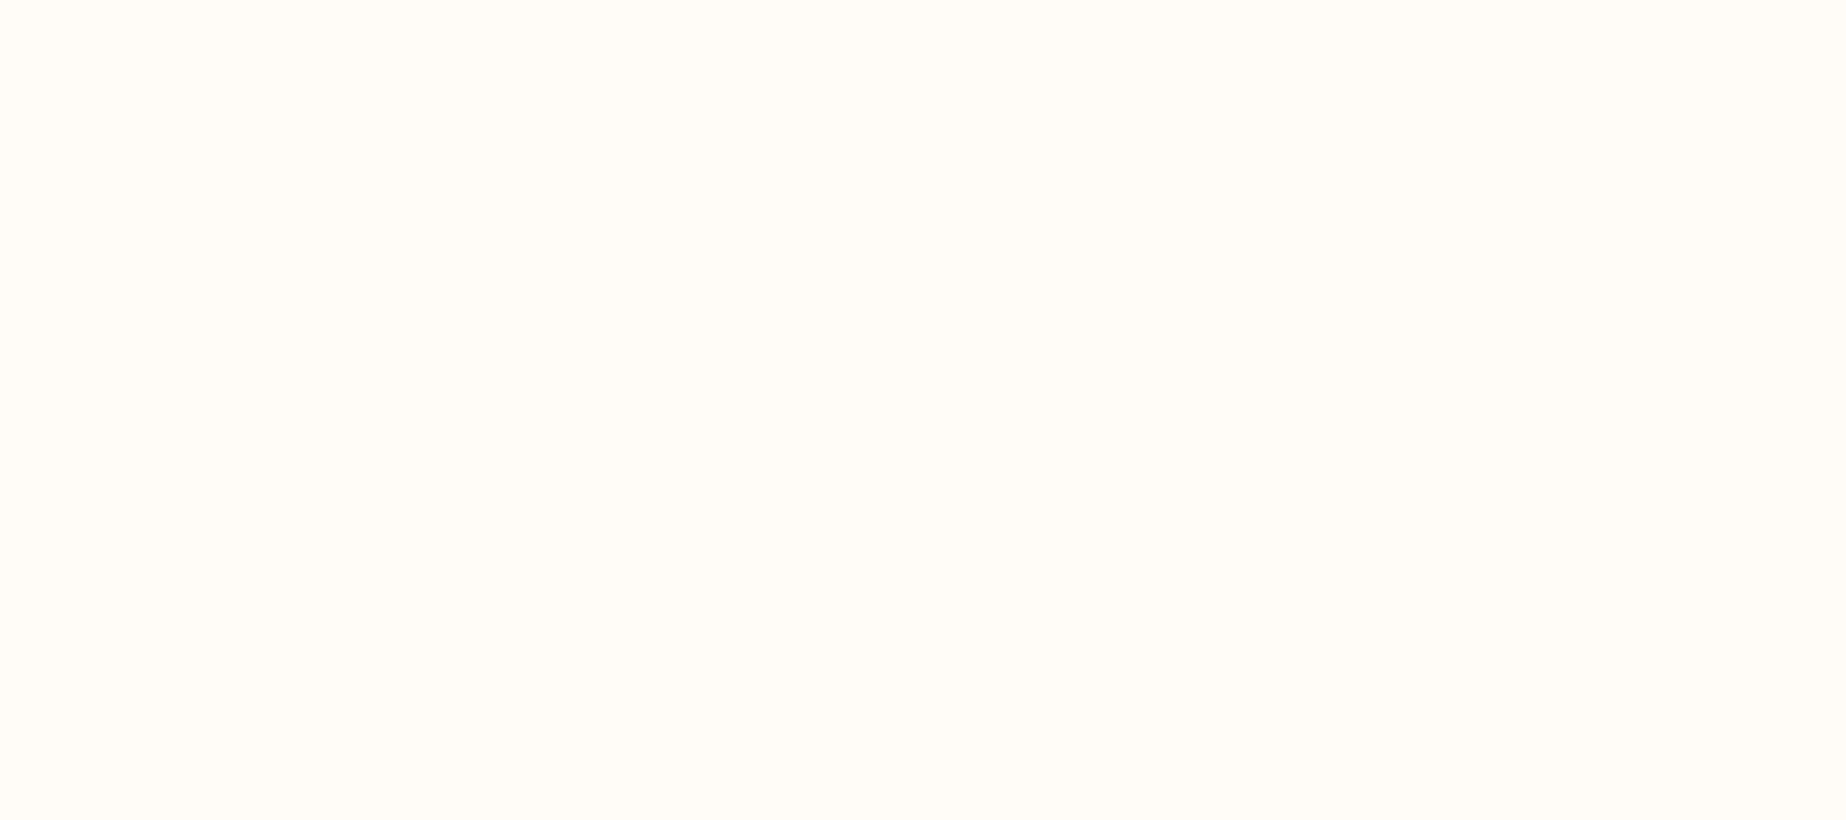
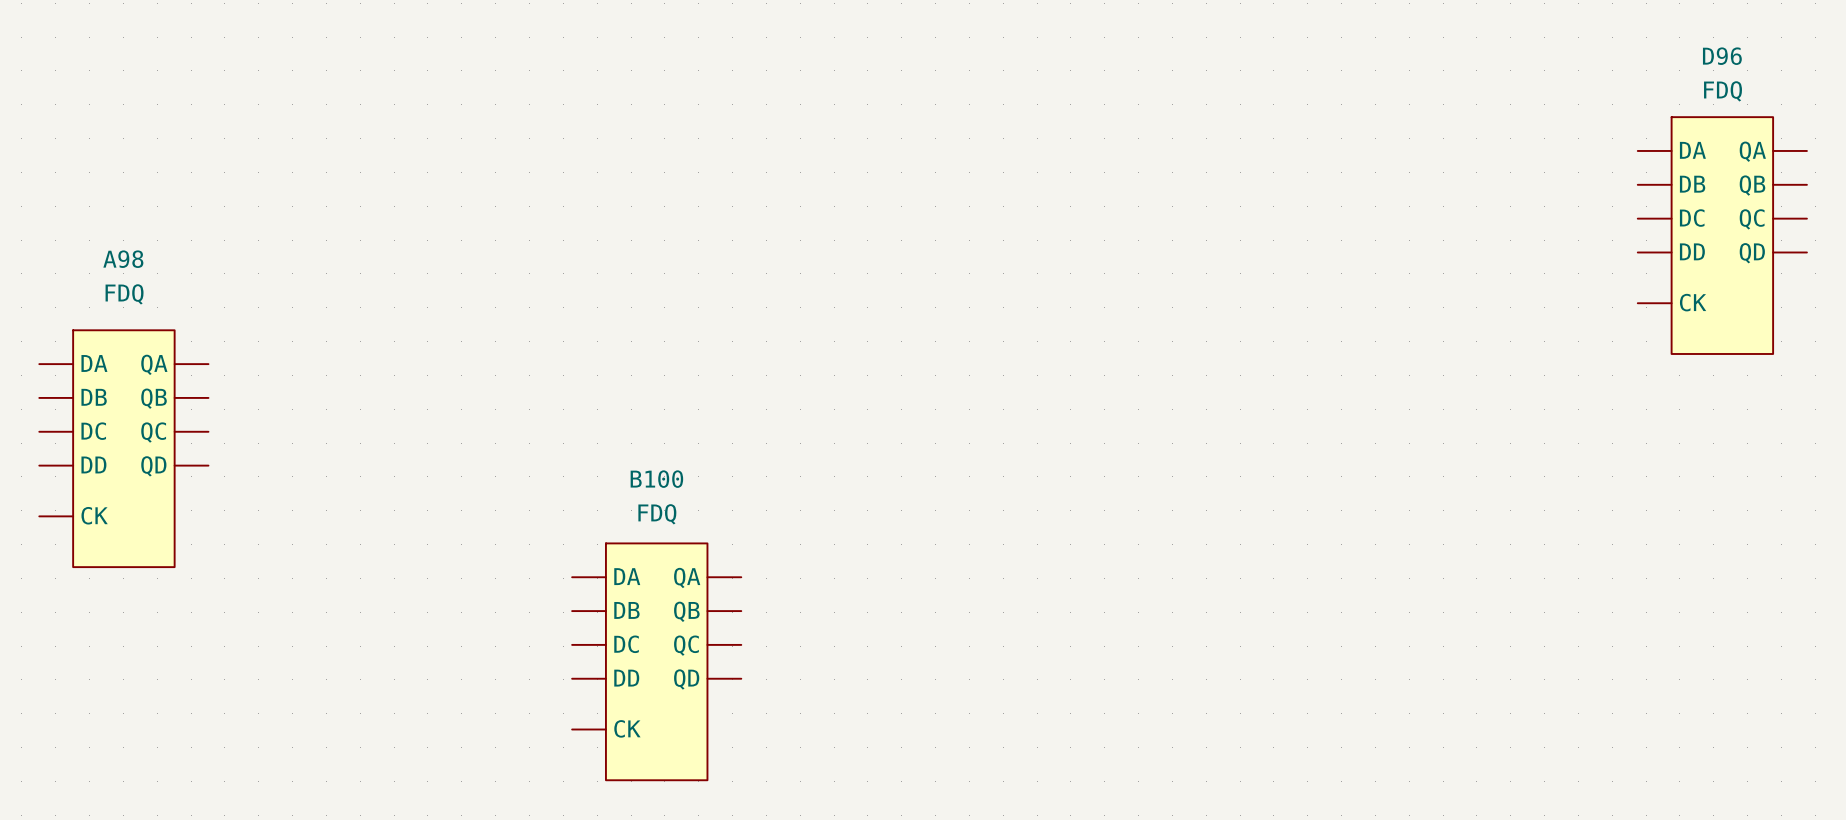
D96: none -> FDQ (1722, 235)
A98: none -> FDQ (123, 448)
B100: none -> FDQ (656, 661)

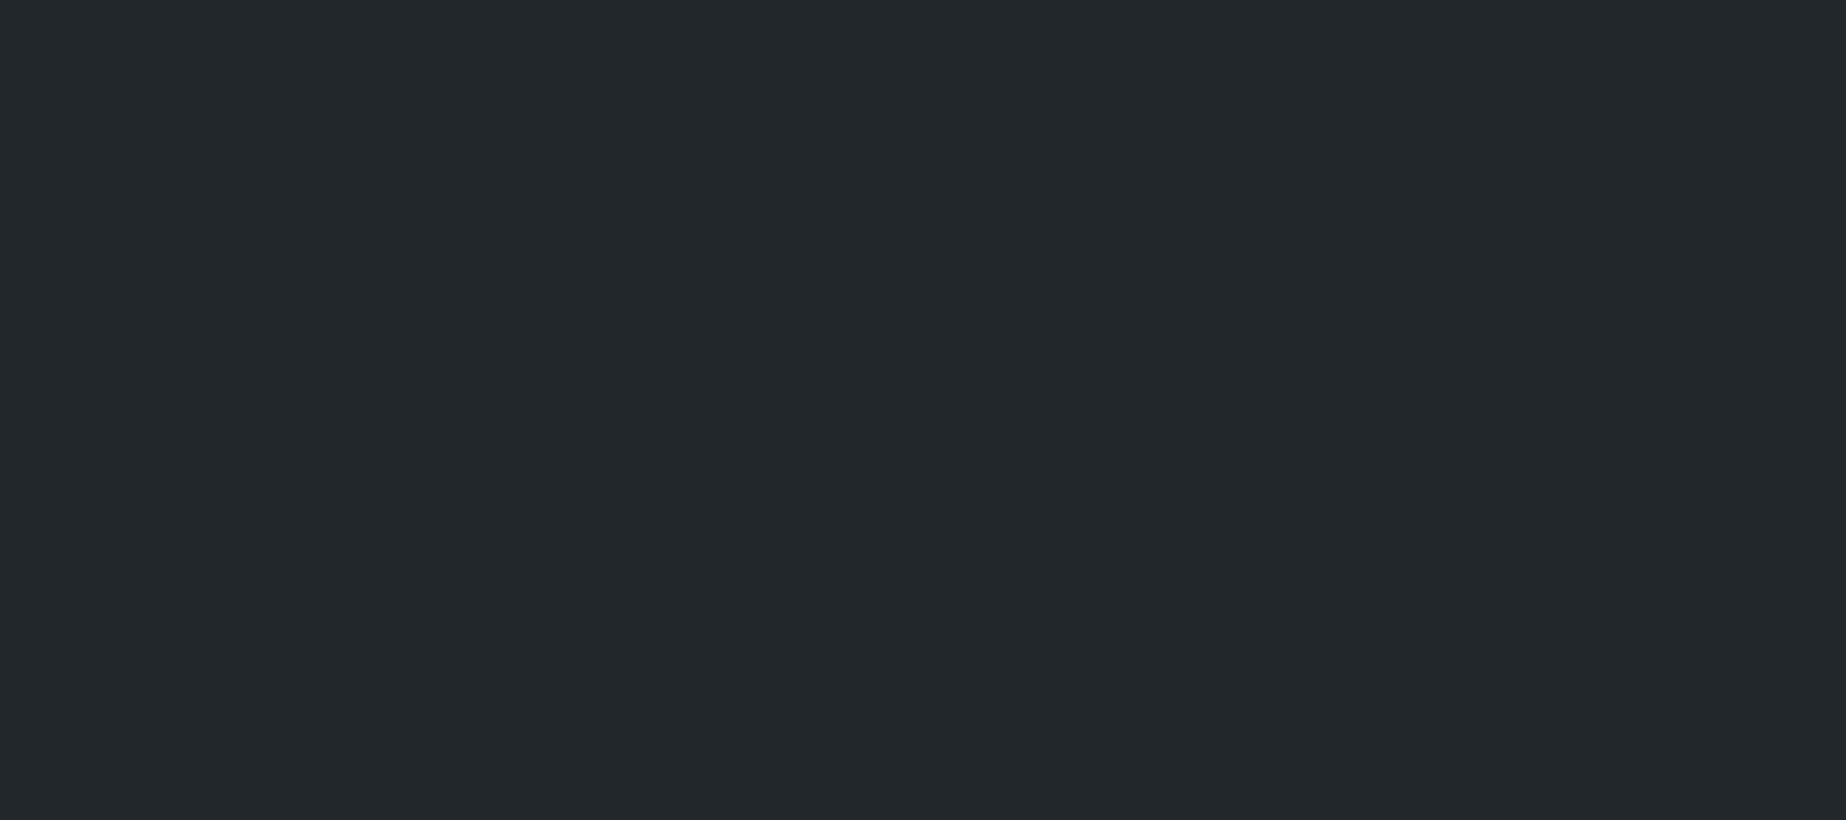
D96: FDQ (1722, 235) -> none
A98: FDQ (123, 448) -> none
B100: FDQ (656, 661) -> none

